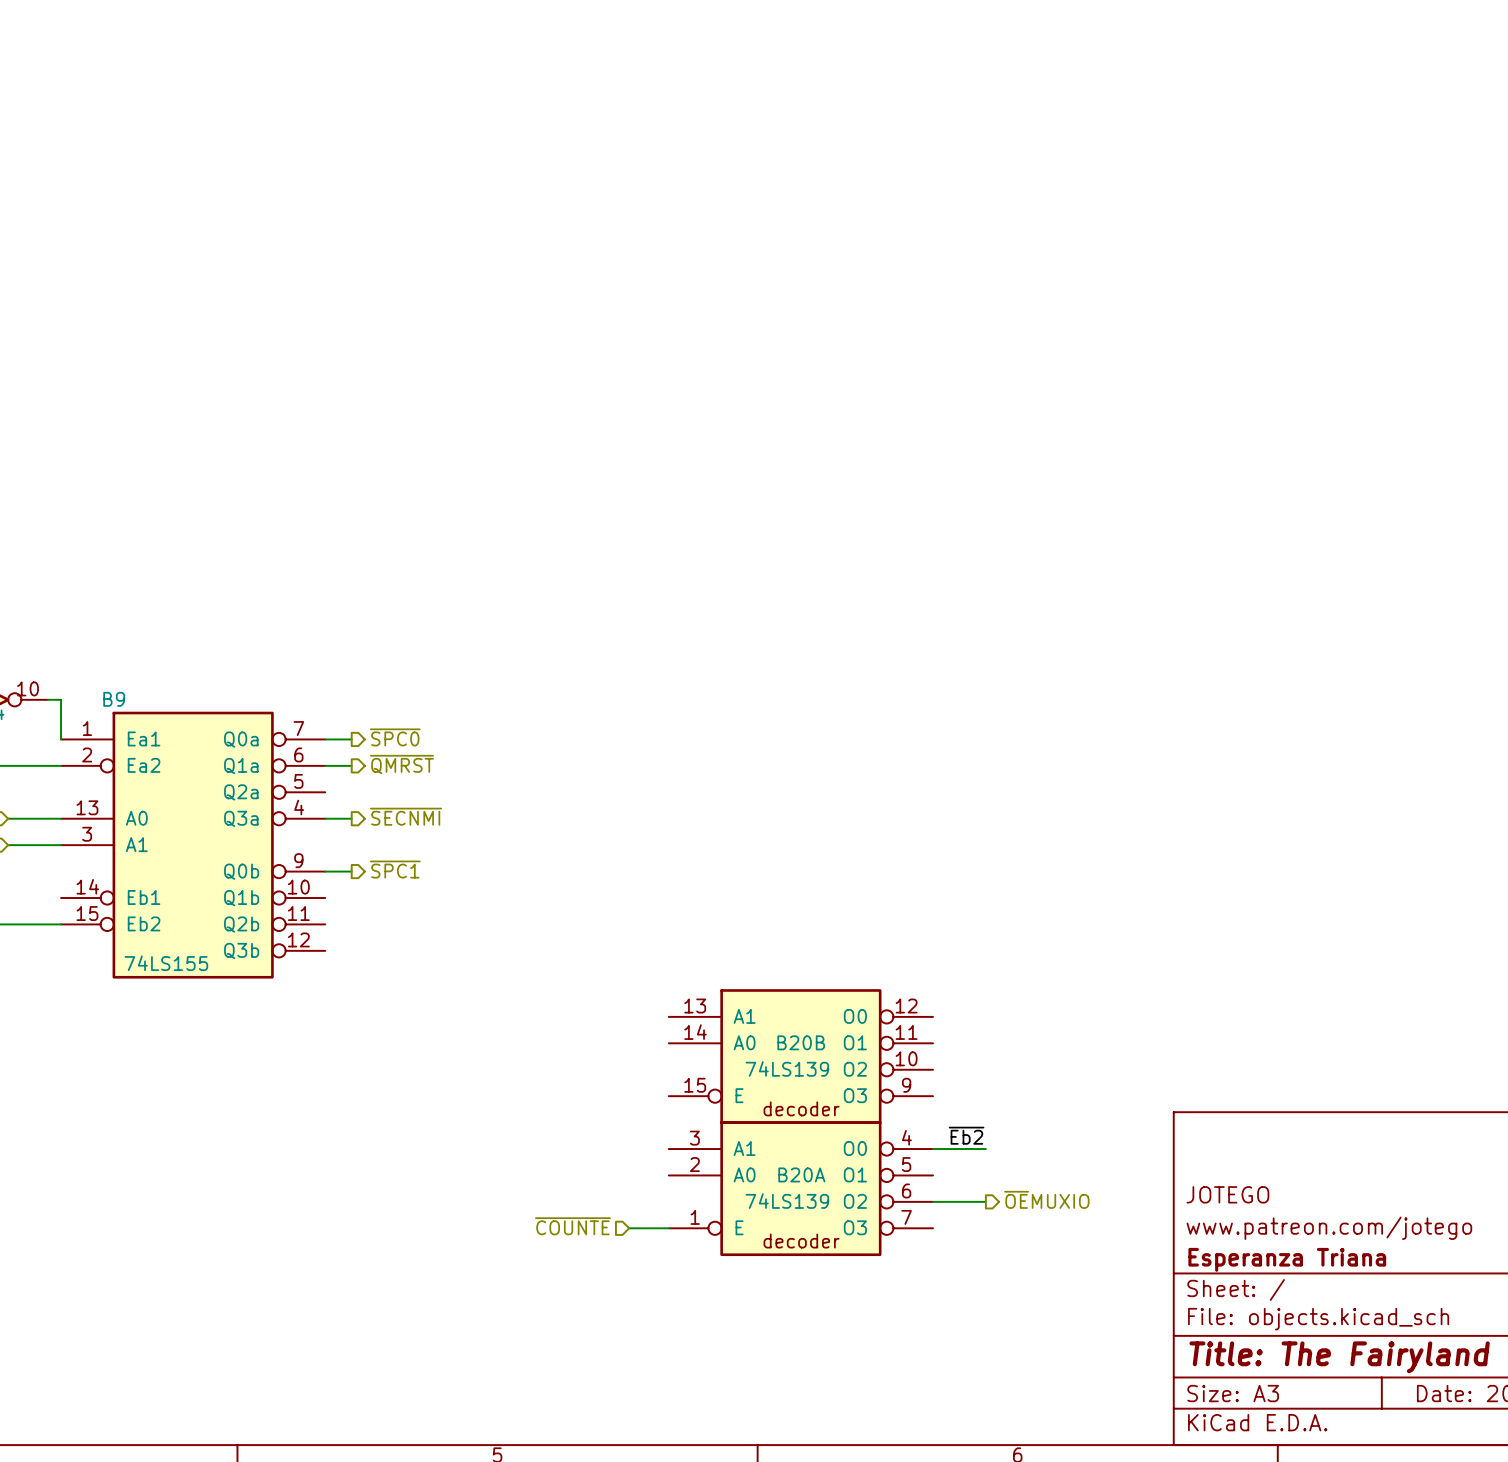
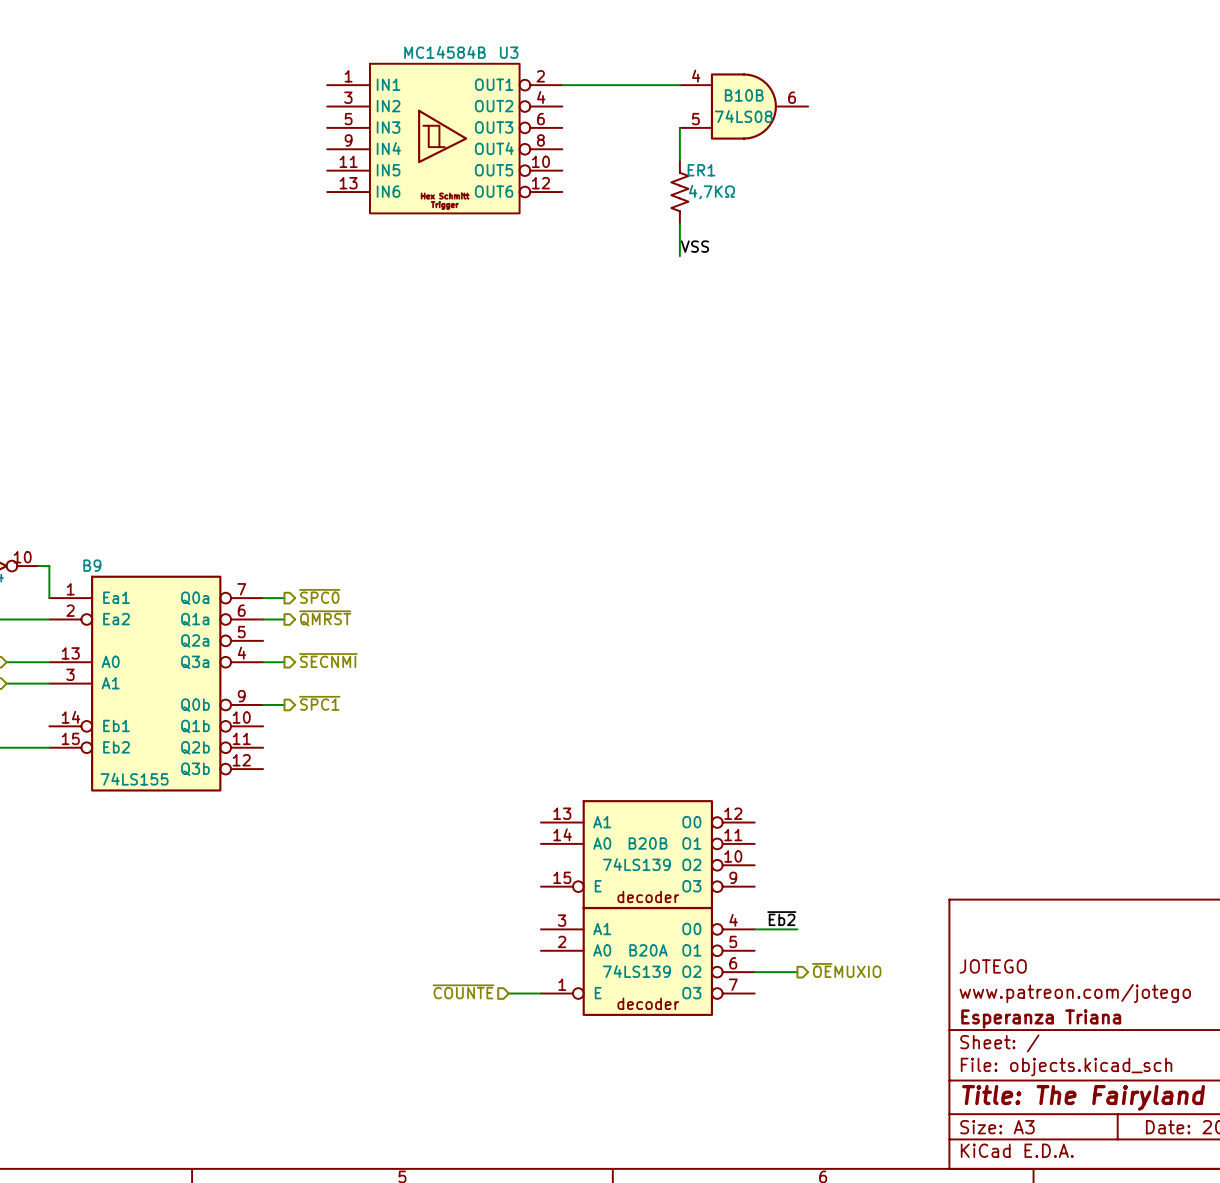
wire: none -> (562, 85) (679, 85)
B10B: none -> 74LS08 (744, 106)
wire: none -> (679, 127) (679, 159)
U3: none -> MC14584B (444, 138)
ER1: none -> 4,7KΩ (679, 192)
wire: none -> (679, 224) (679, 256)
label: none -> VSS (694, 246)

